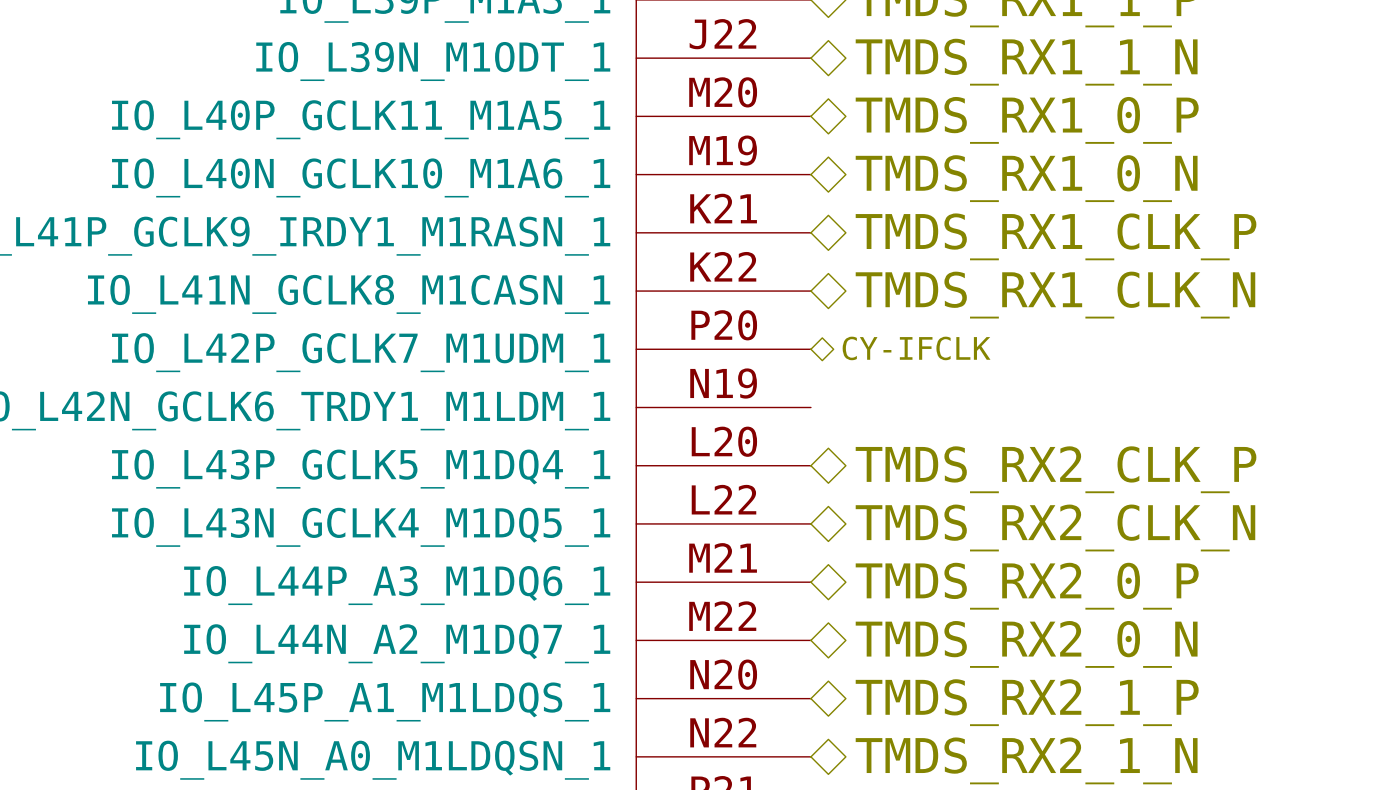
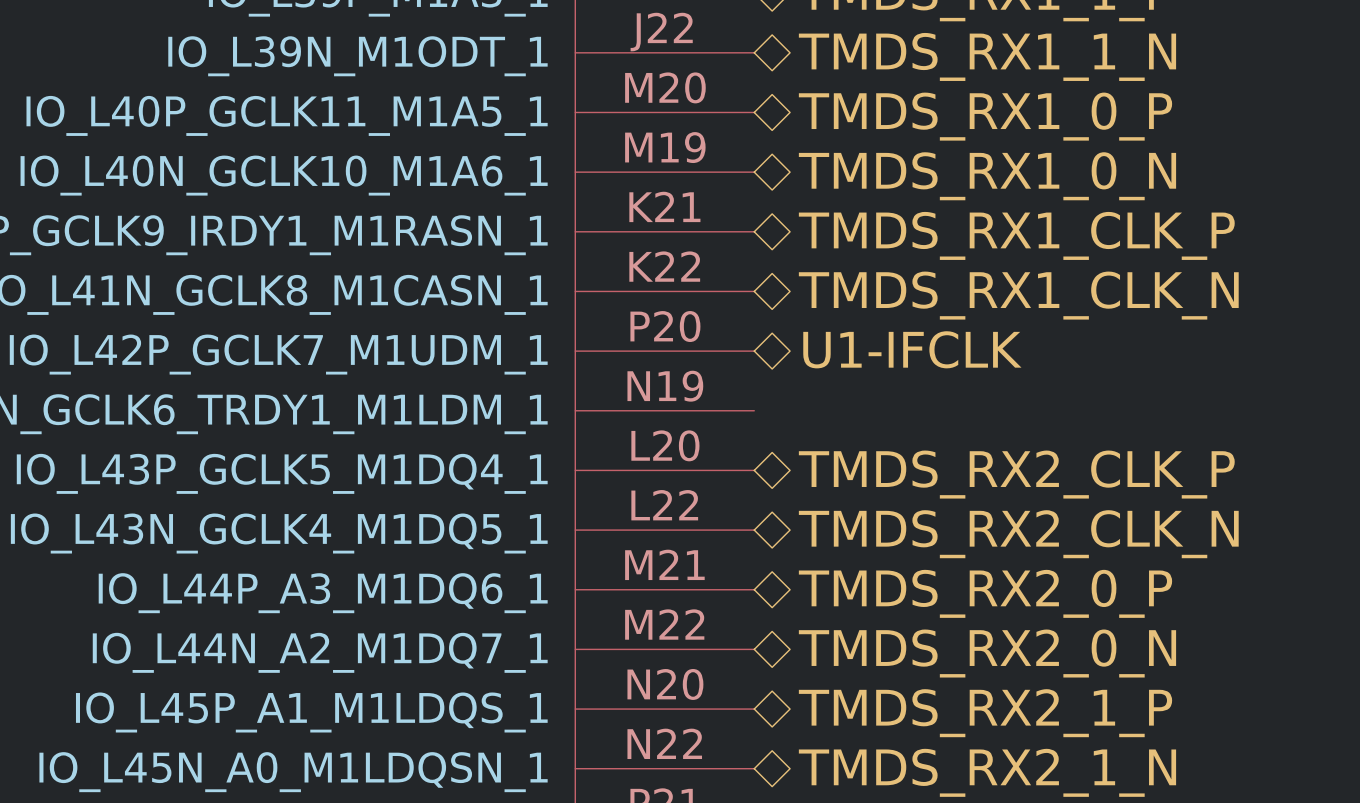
hierarchical label: CY-IFCLK (916, 348) -> U1-IFCLK (912, 349)

